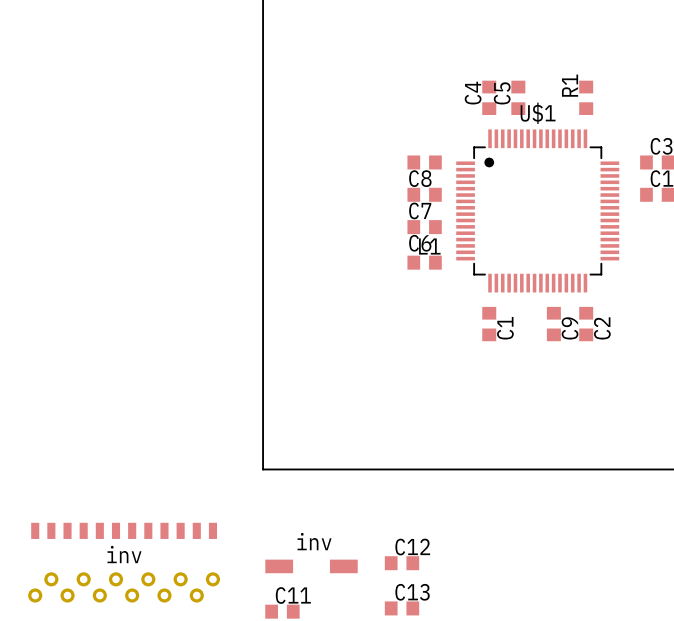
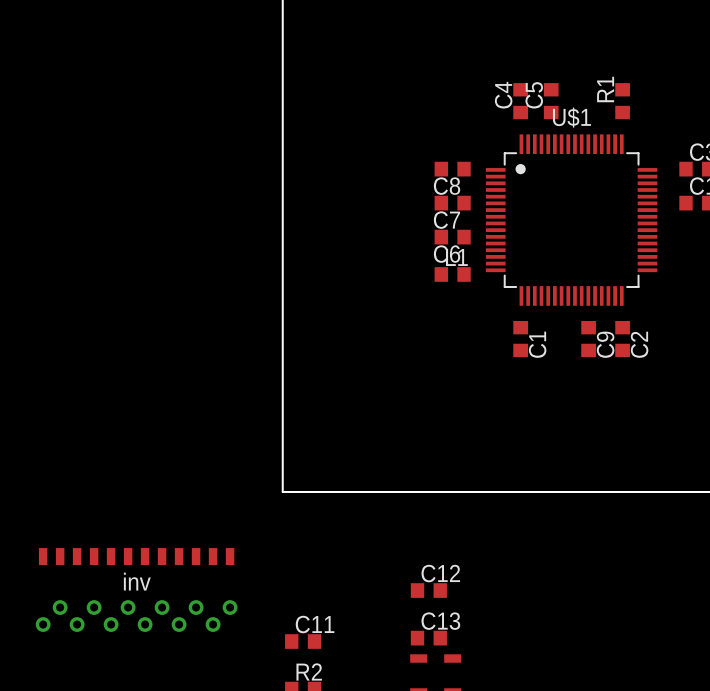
part: (311, 566) -> none

